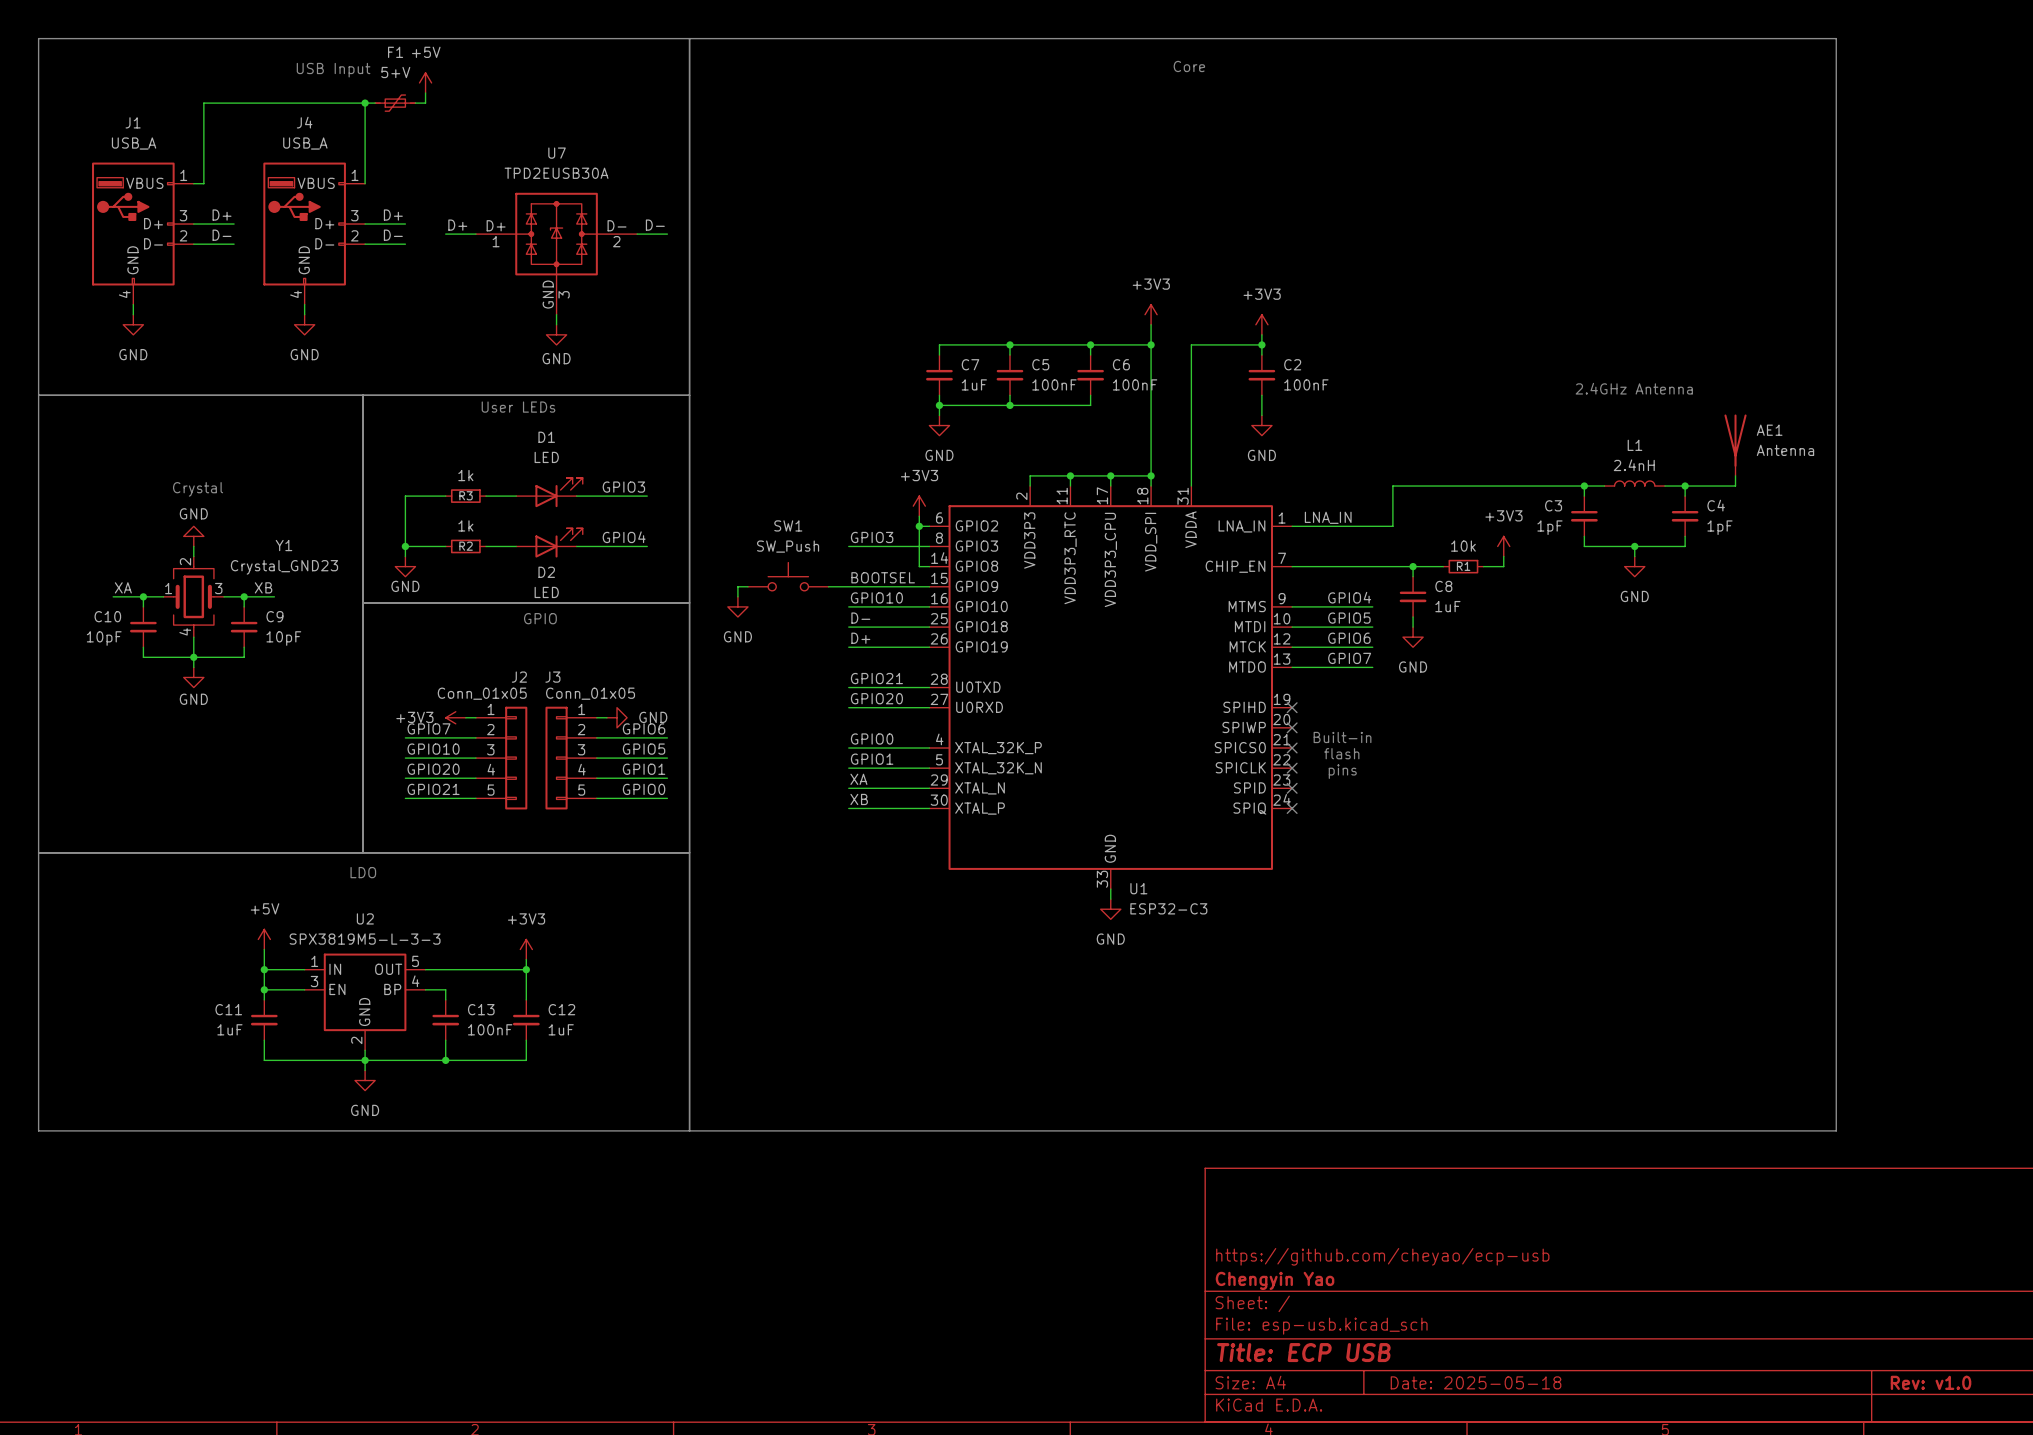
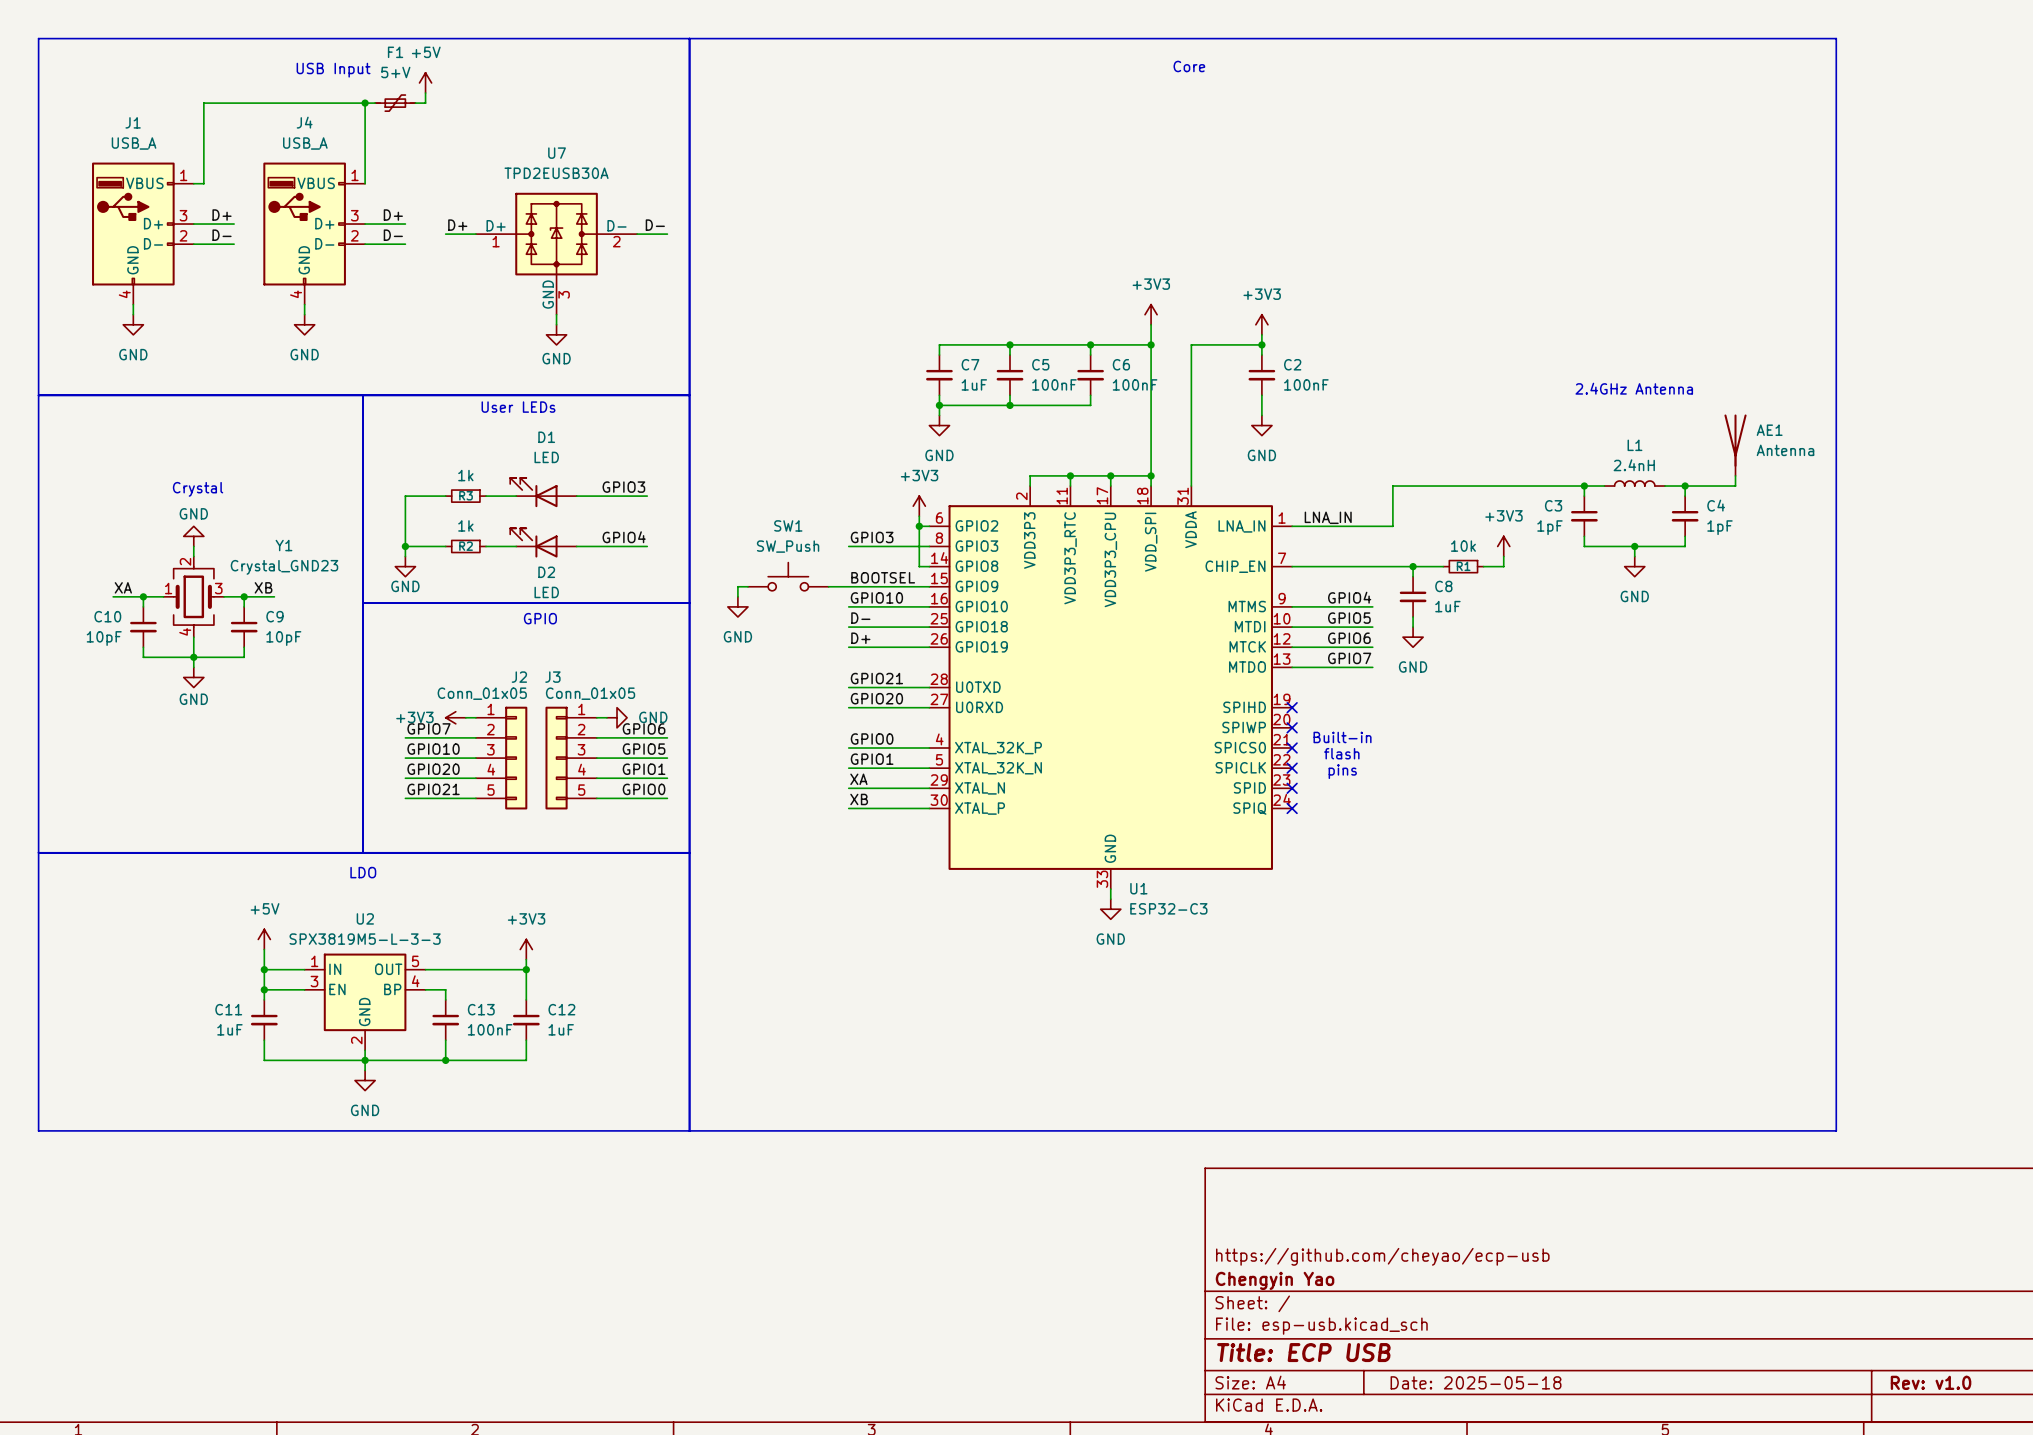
D1 flip: as is (559, 492) -> left-right (533, 492)
D2 flip: as is (559, 542) -> left-right (533, 542)

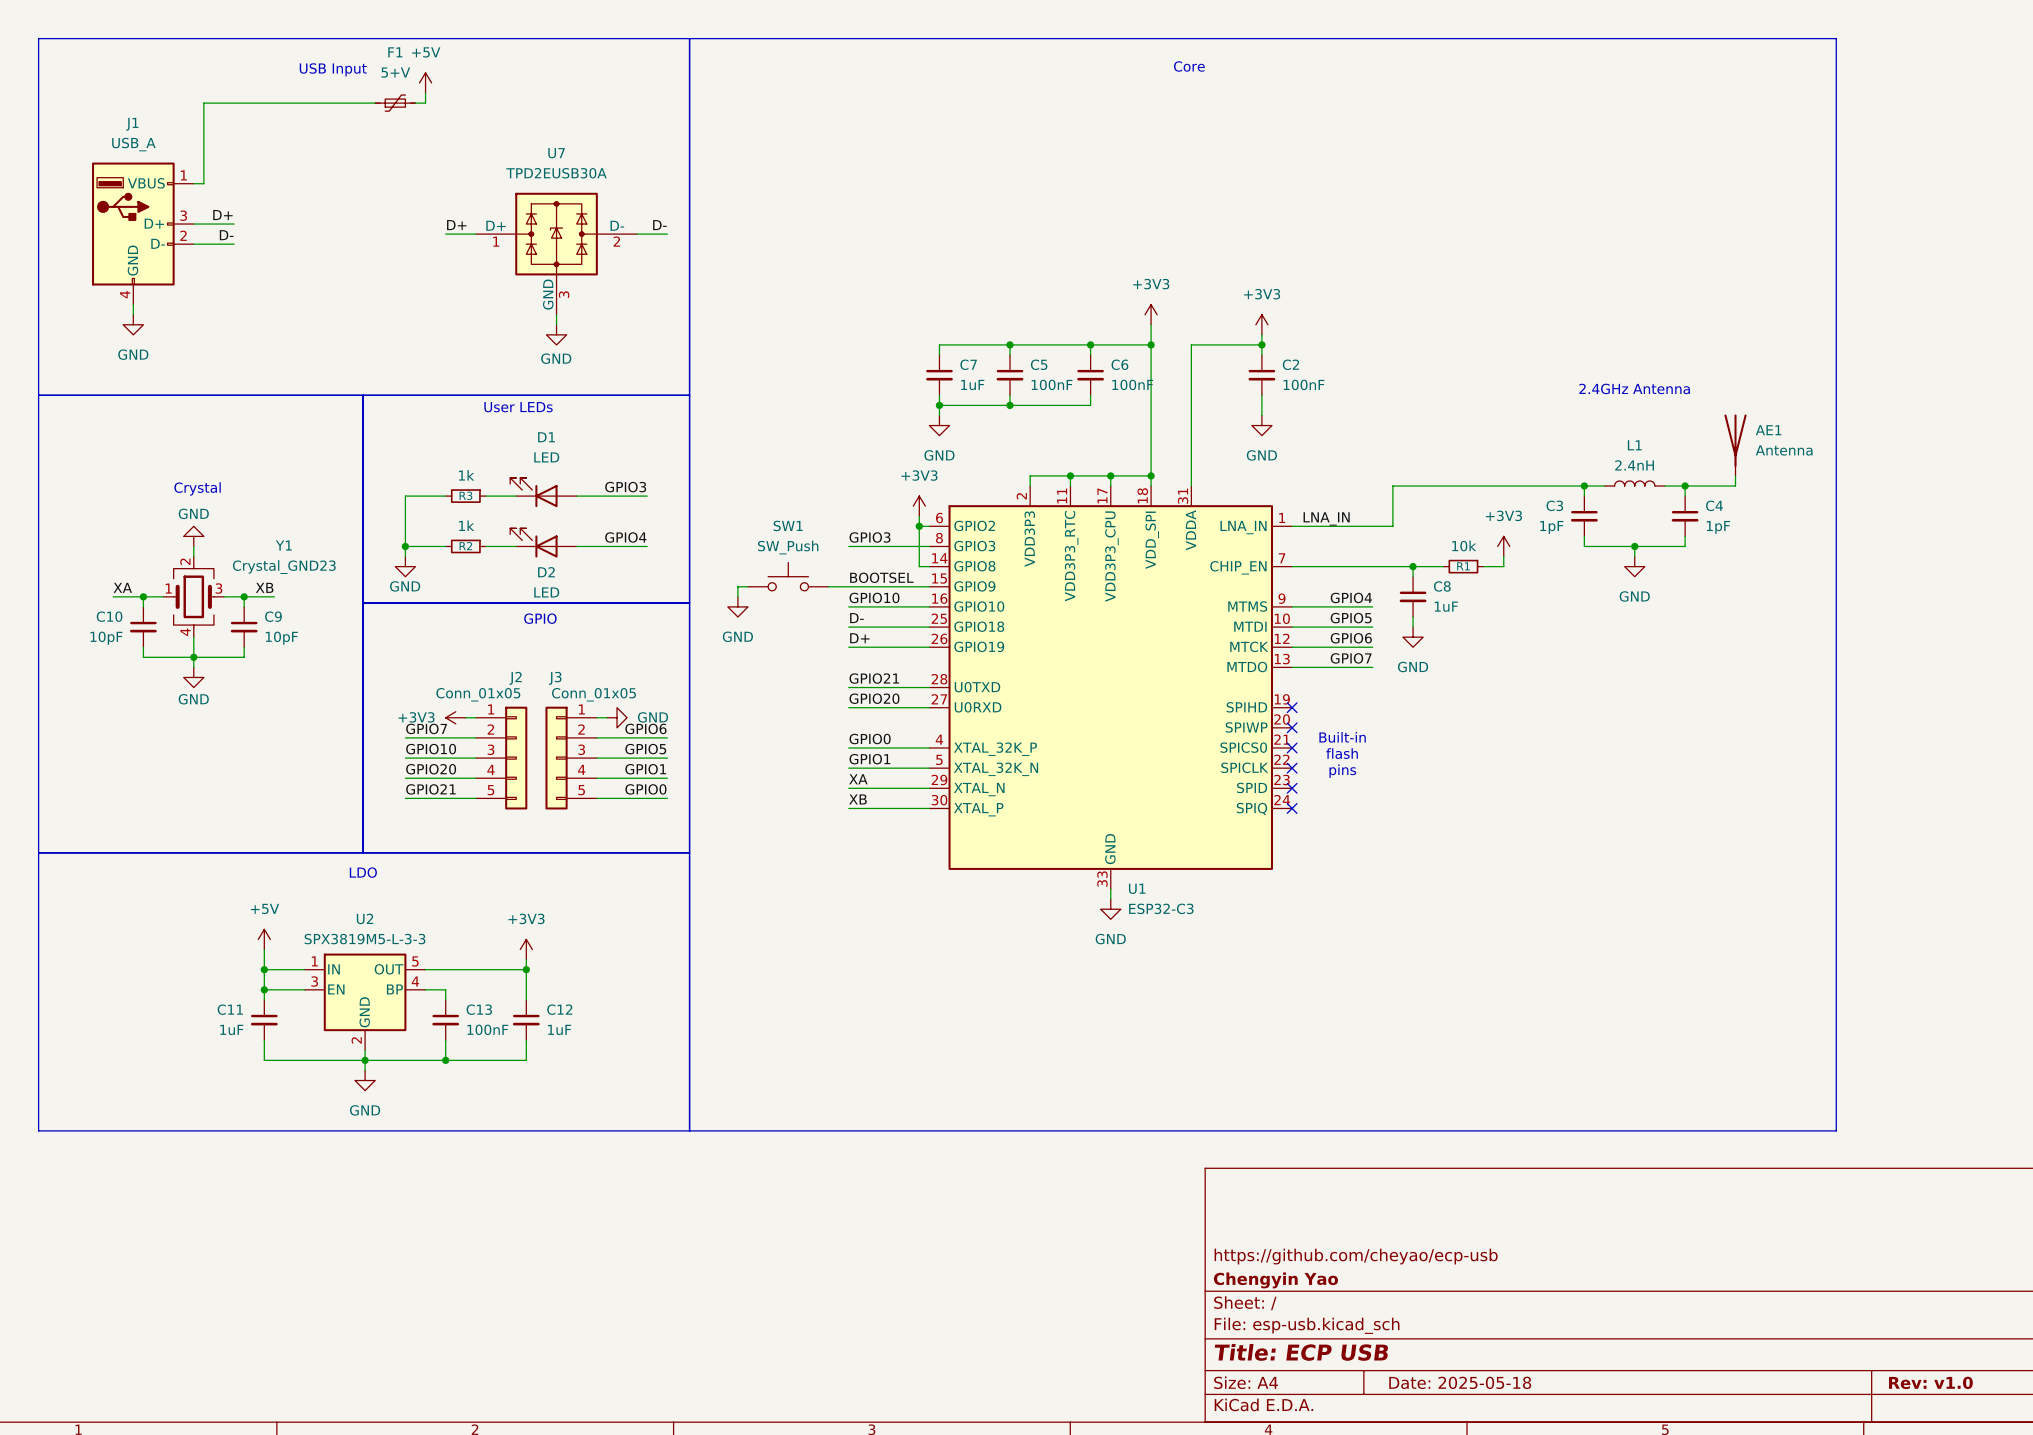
wire: (365, 103) (365, 183) -> none
junction: (365, 103) -> none
label: D+ (393, 215) -> none
wire: (365, 224) (405, 224) -> none
J4: USB_A (314, 233) -> none
label: D- (393, 235) -> none
wire: (365, 244) (405, 244) -> none
wire: (304, 304) (304, 314) -> none
power symbol: GND (304, 324) -> none

